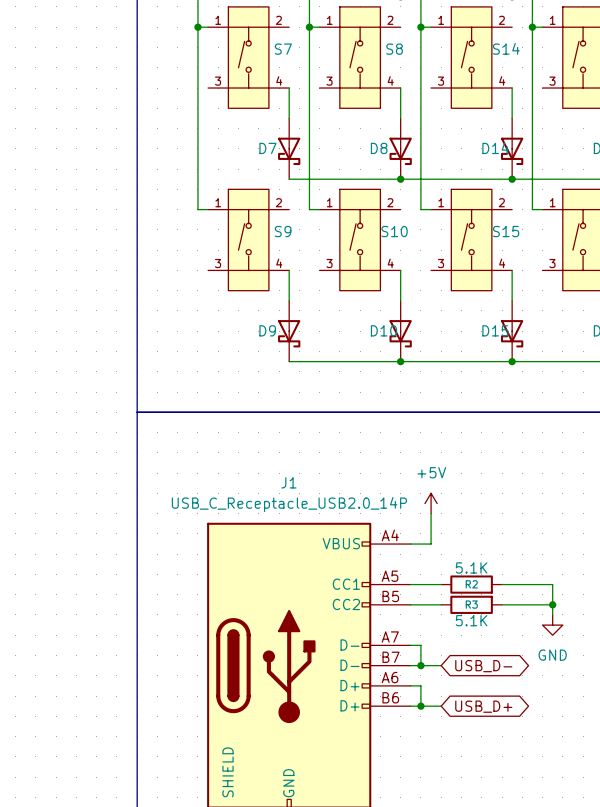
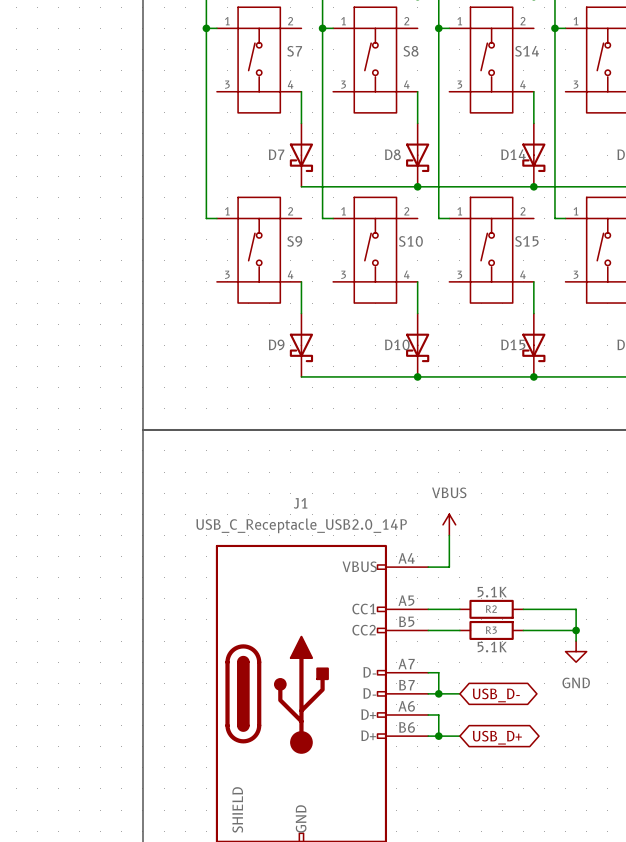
power symbol: +5V (431, 503) -> VBUS (449, 524)

